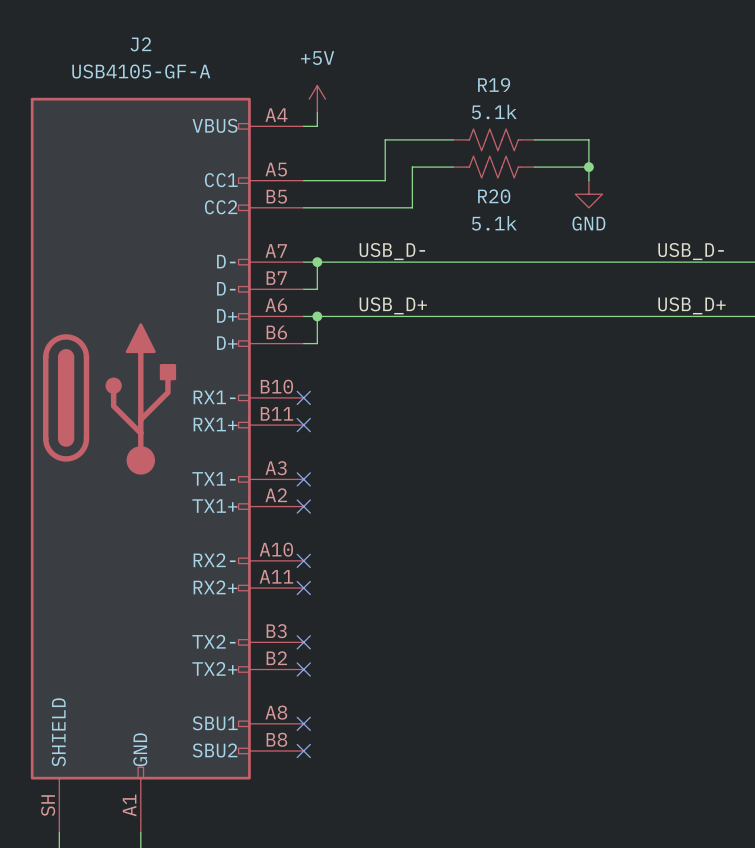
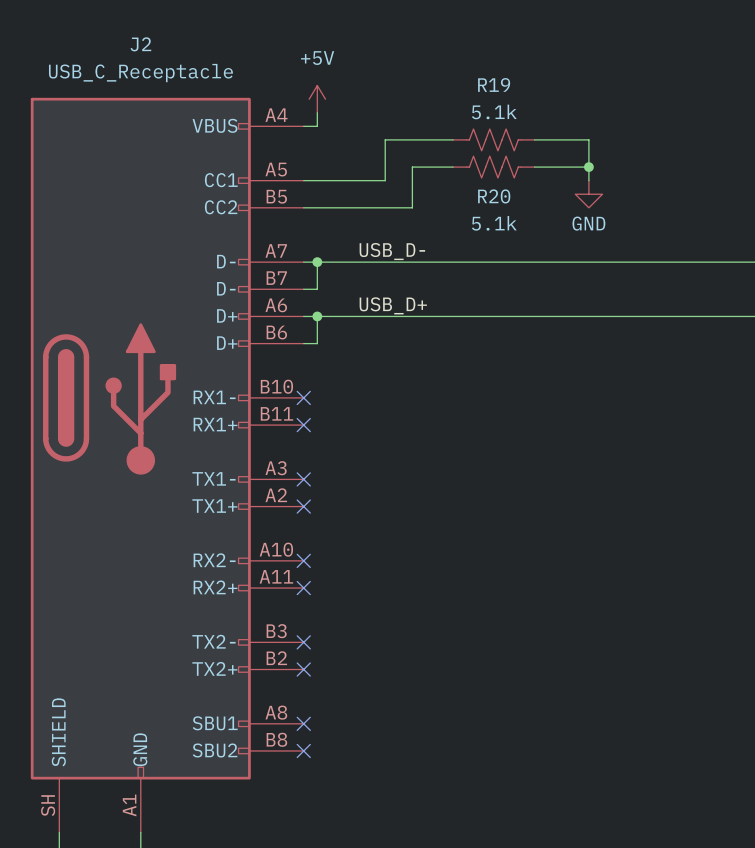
J2 value: USB4105-GF-A (141, 71) -> USB_C_Receptacle (140, 73)
label: USB_D- (691, 251) -> none
label: USB_D+ (692, 305) -> none

